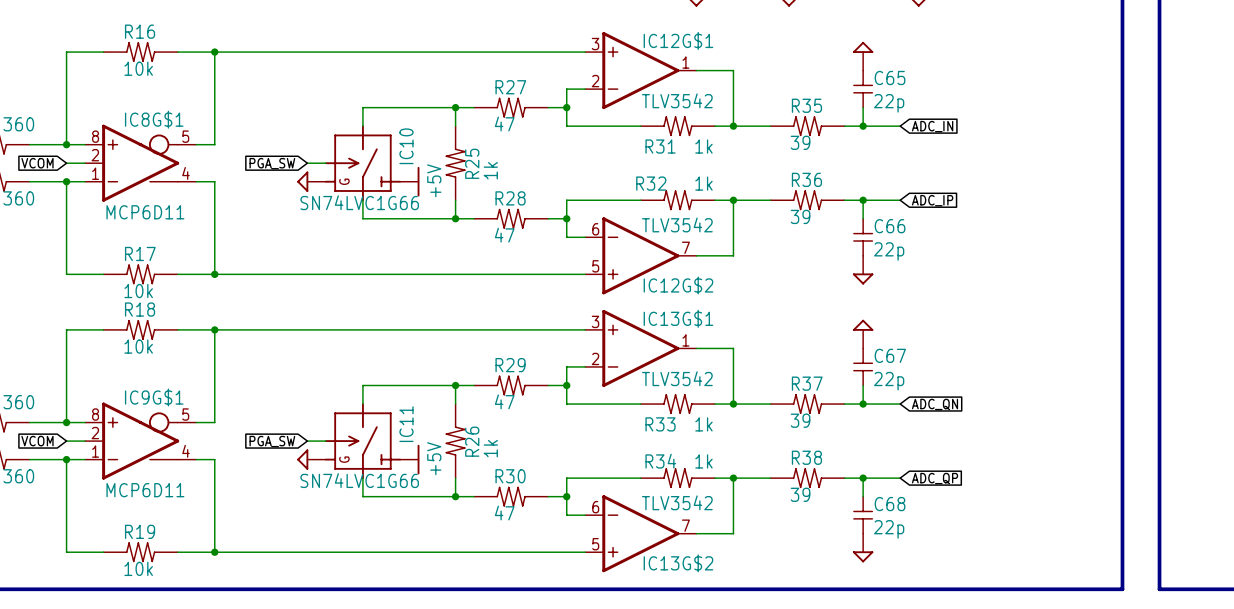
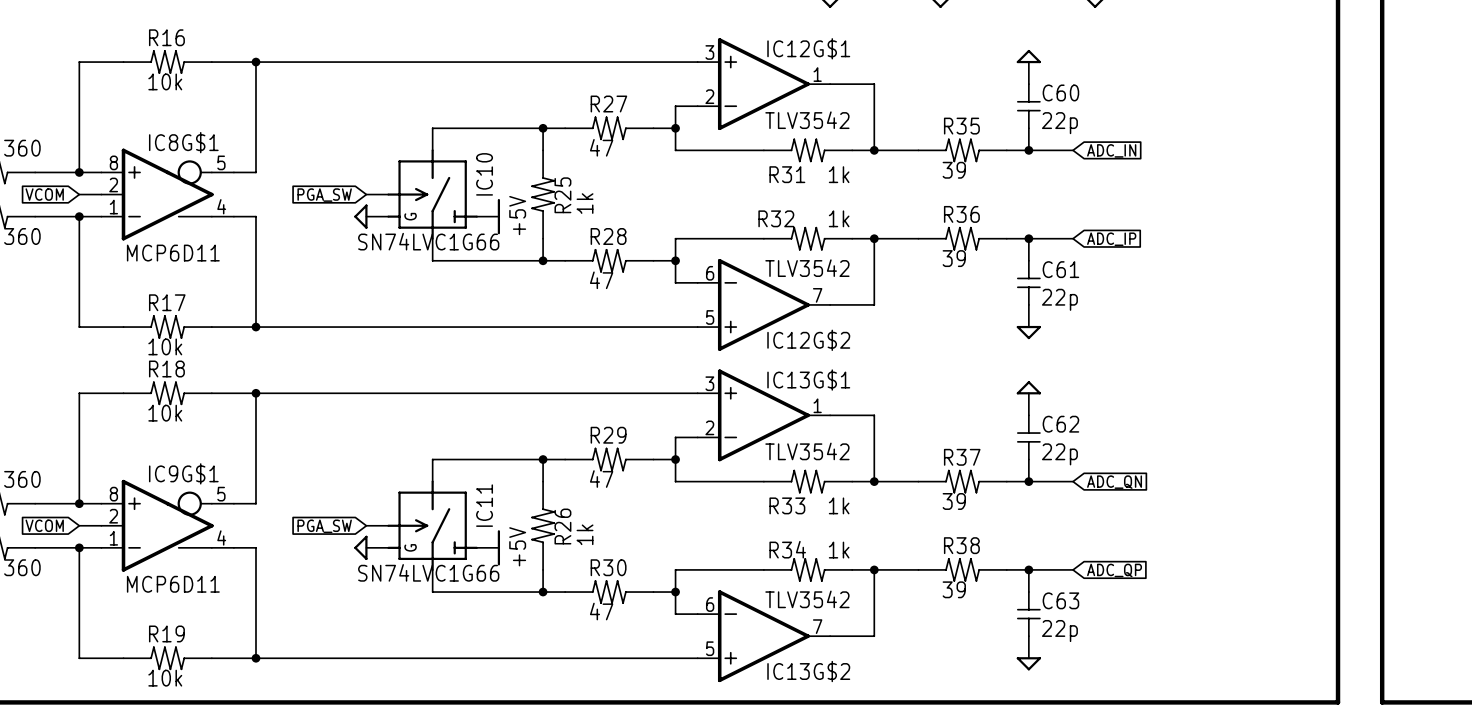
C65 name: C65 (890, 77) -> C60 (1060, 92)
C66 name: C66 (890, 226) -> C61 (1060, 269)
C67 name: C67 (890, 355) -> C62 (1060, 424)
C68 name: C68 (890, 504) -> C63 (1060, 600)

